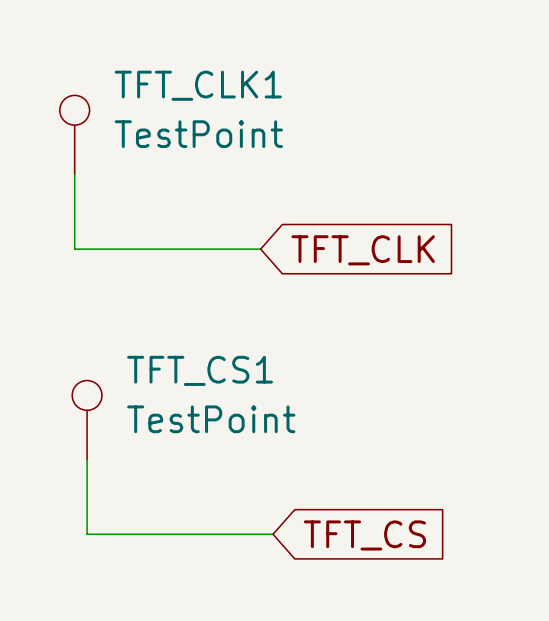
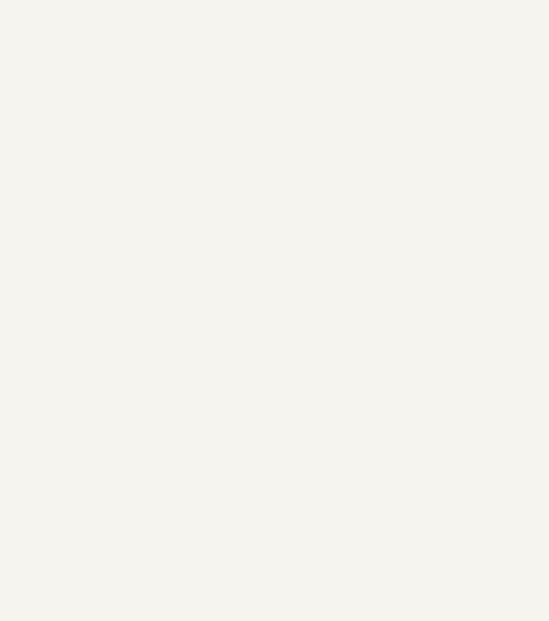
TFT_CLK1: TestPoint (74, 135) -> none
wire: (74, 174) (74, 249) (260, 249) -> none
global label: TFT_CLK (363, 250) -> none
TFT_CS1: TestPoint (87, 420) -> none
wire: (87, 459) (87, 534) (273, 534) -> none
global label: TFT_CS (364, 535) -> none

